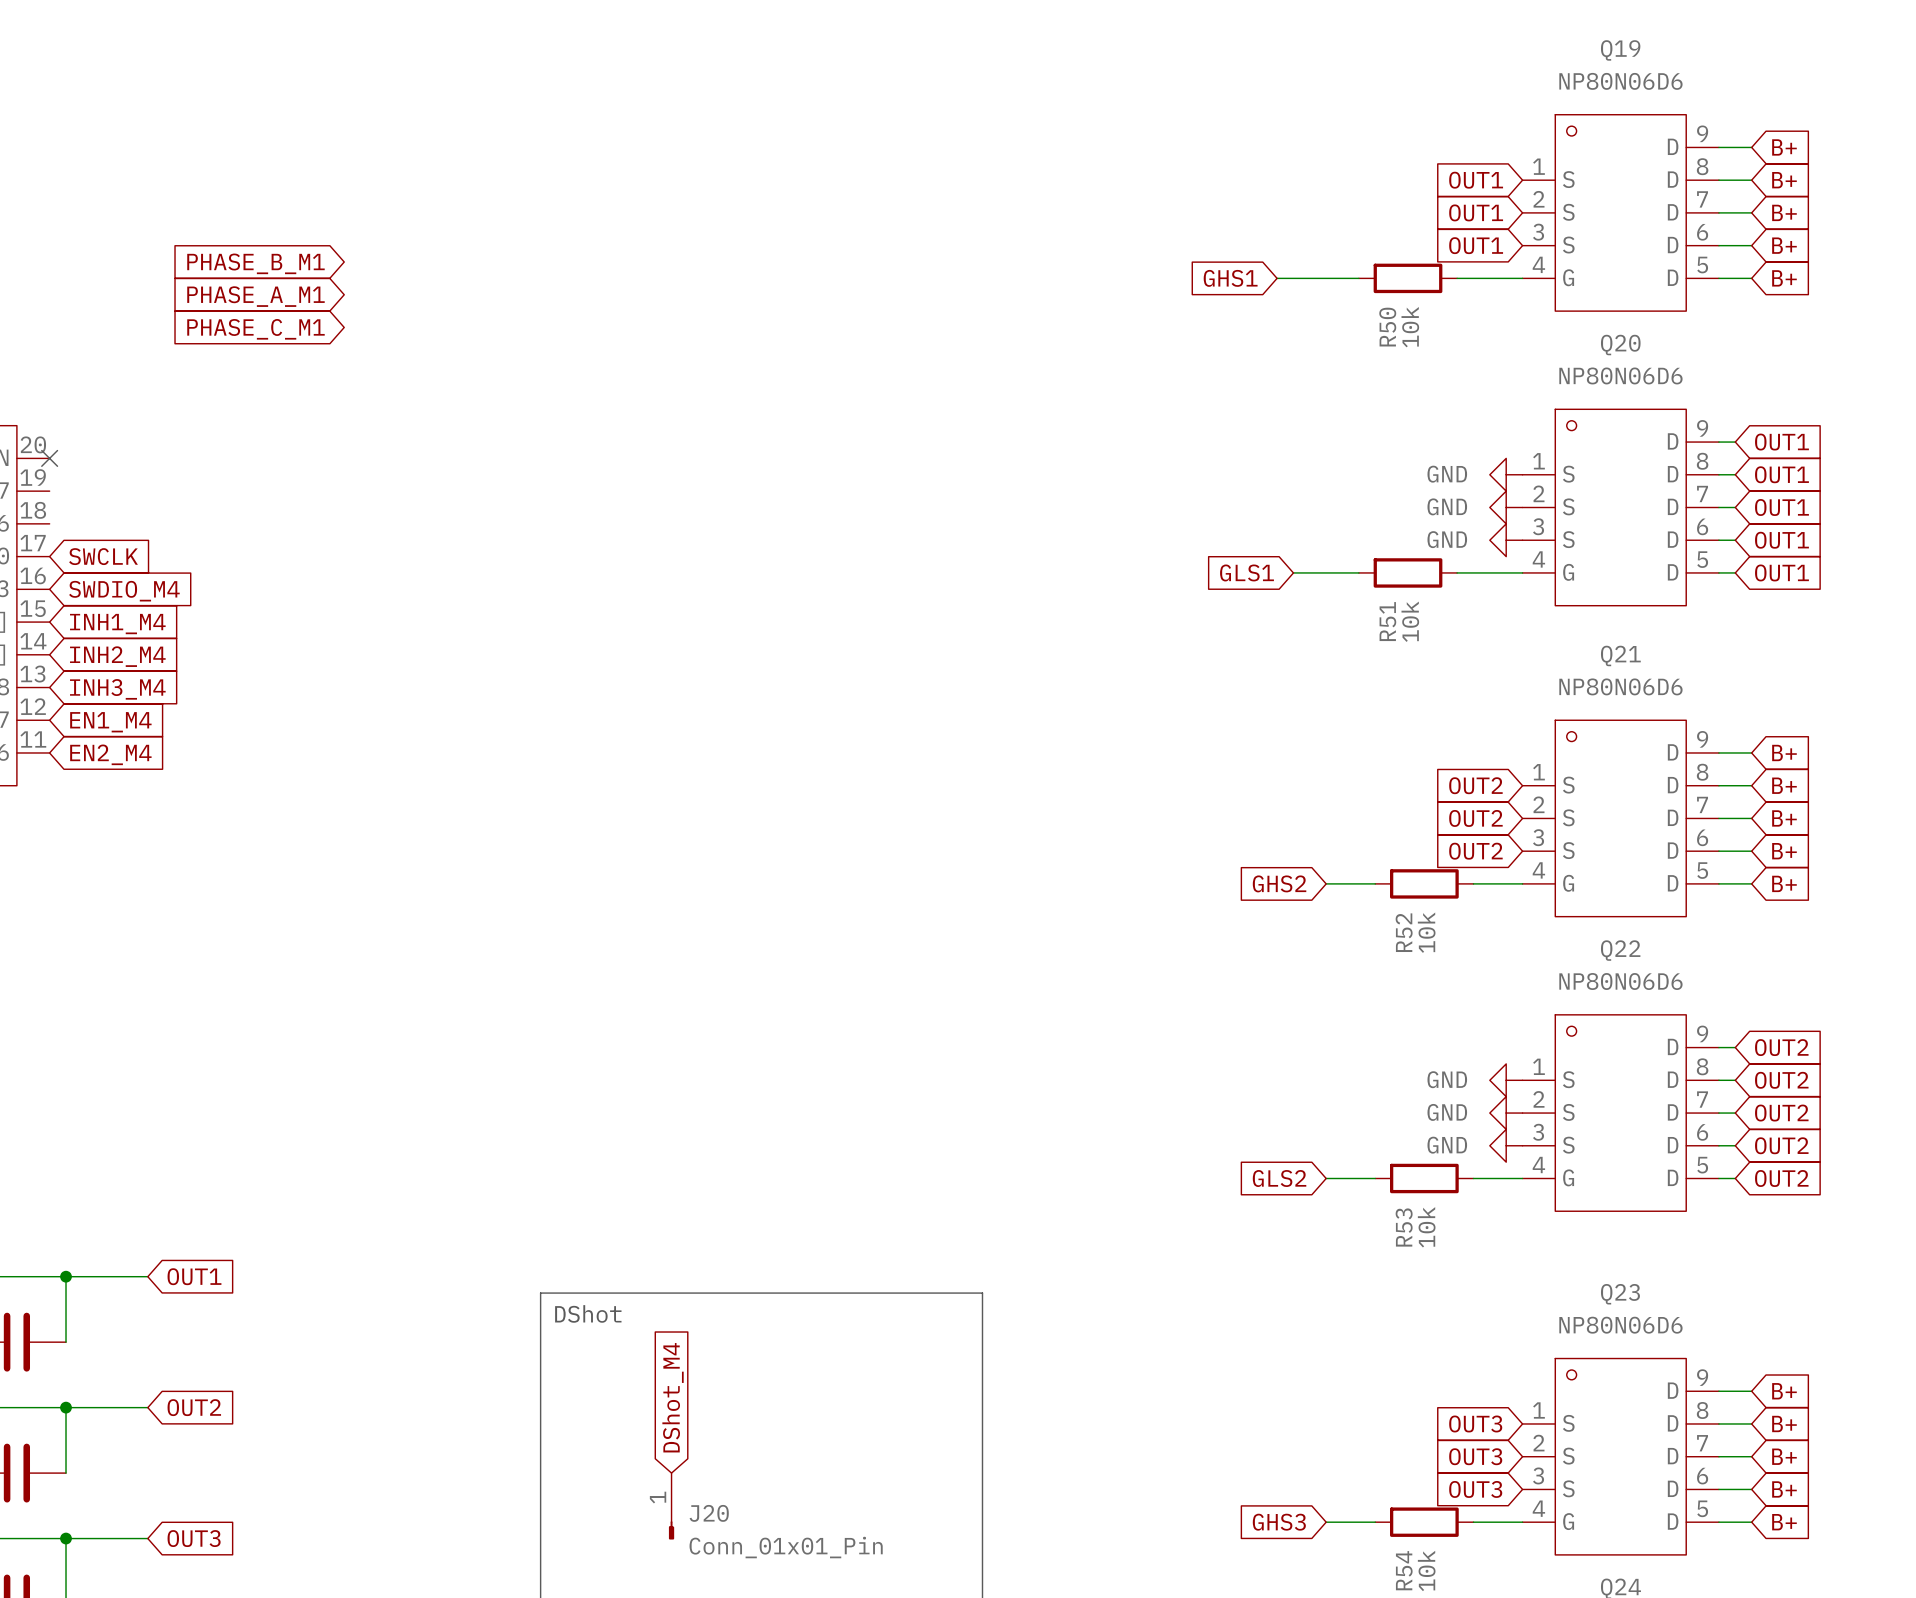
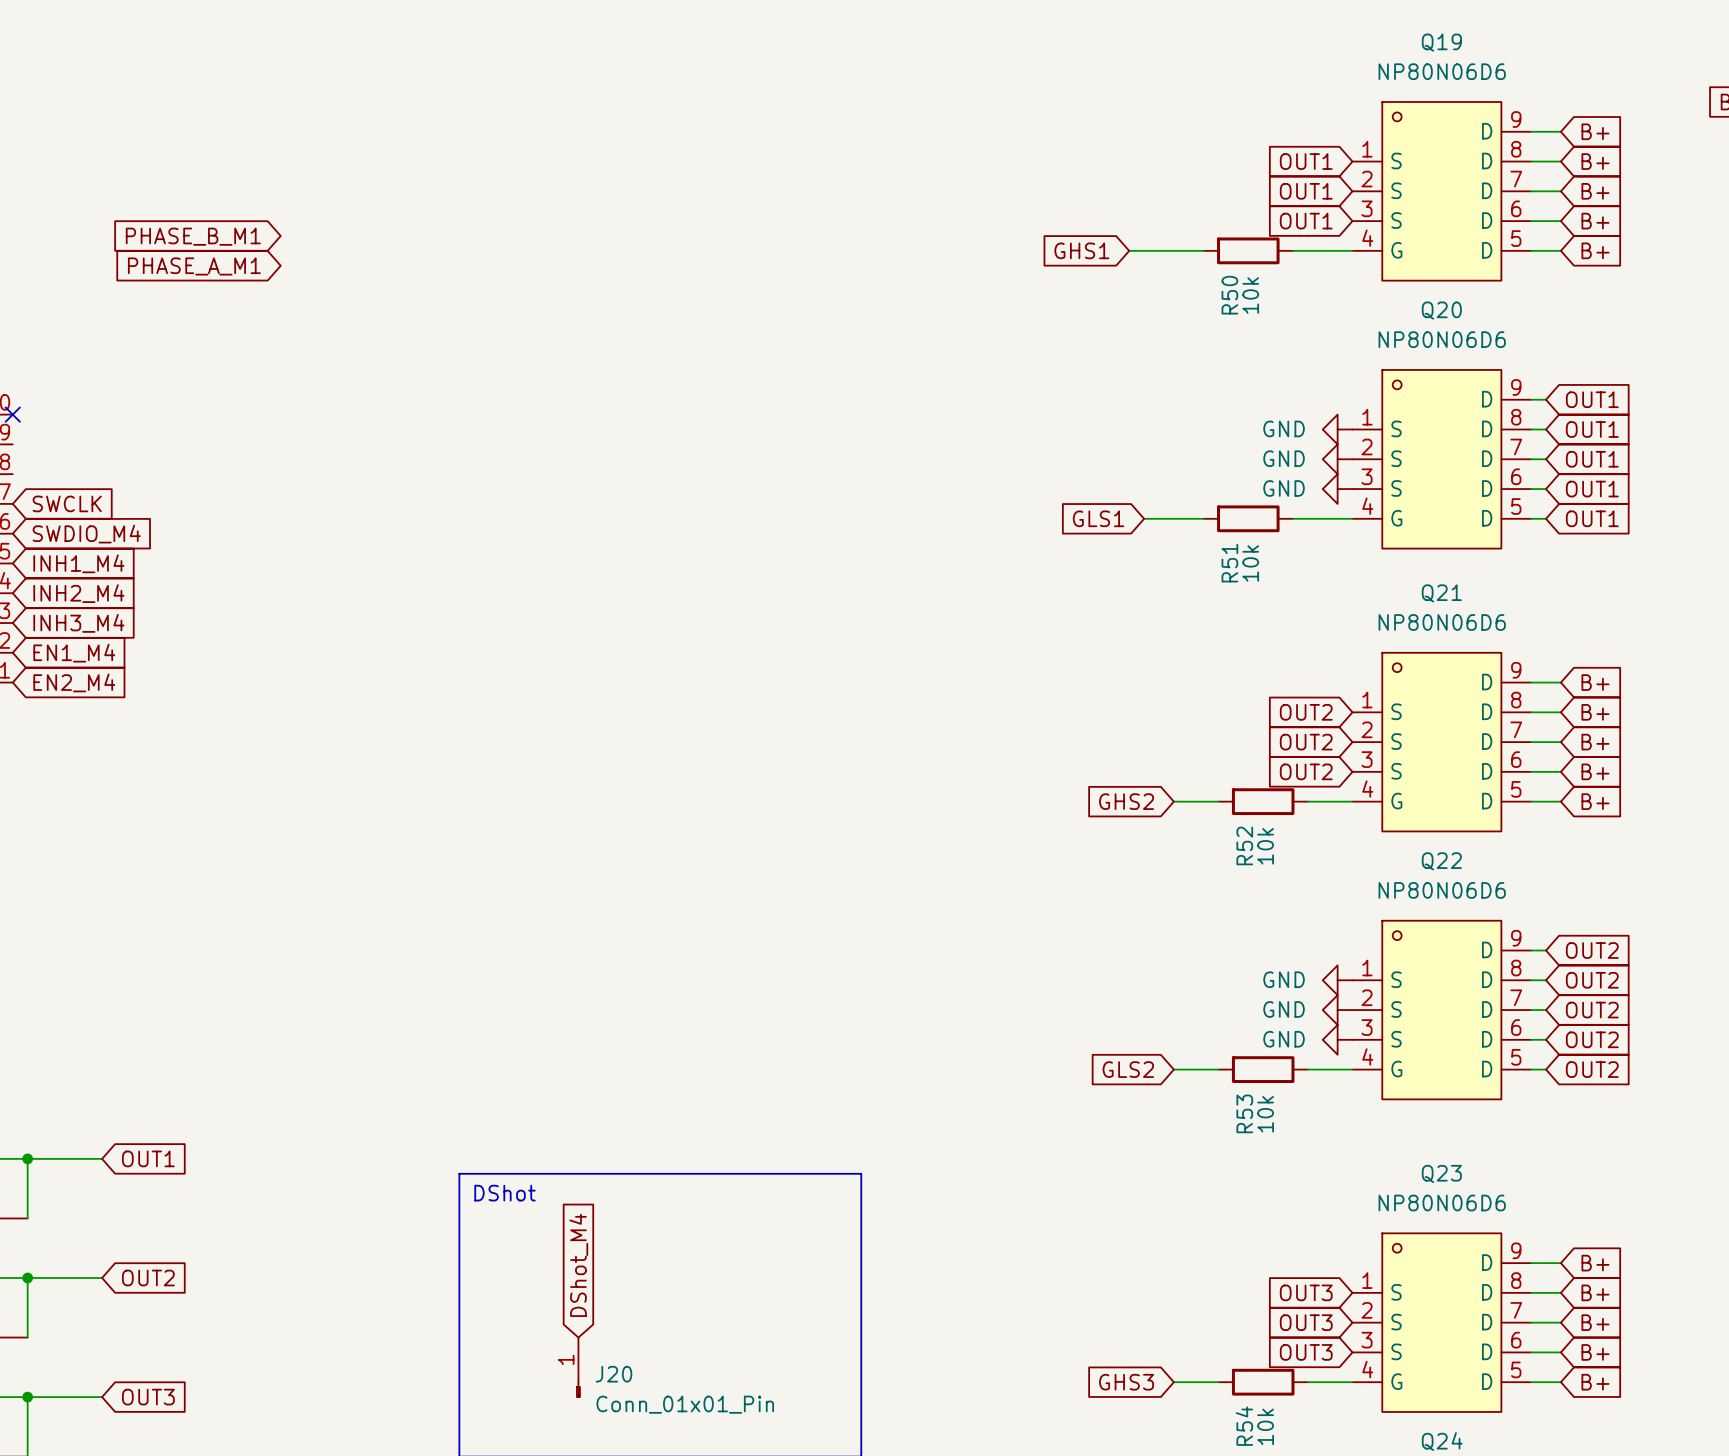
global label: PHASE_C_M1 (255, 329) -> none

